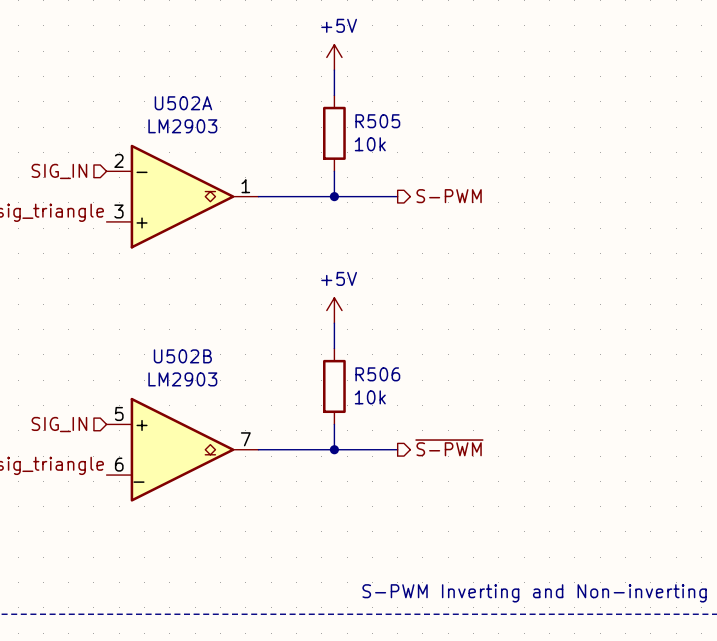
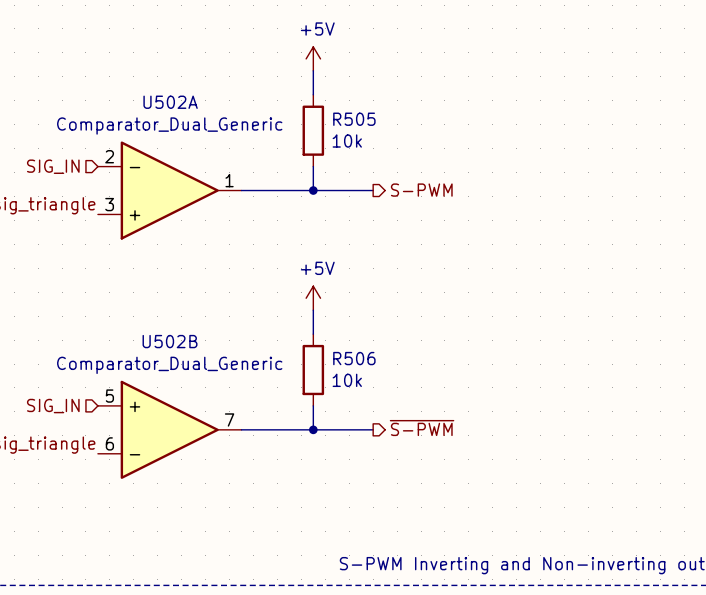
U502A value: LM2903 (182, 126) -> Comparator_Dual_Generic (169, 126)
U502A symbol: [106, 144, 259, 249] -> [97, 141, 242, 240]
U502B value: LM2903 (182, 379) -> Comparator_Dual_Generic (169, 365)
U502B symbol: [106, 397, 259, 502] -> [97, 380, 242, 479]

